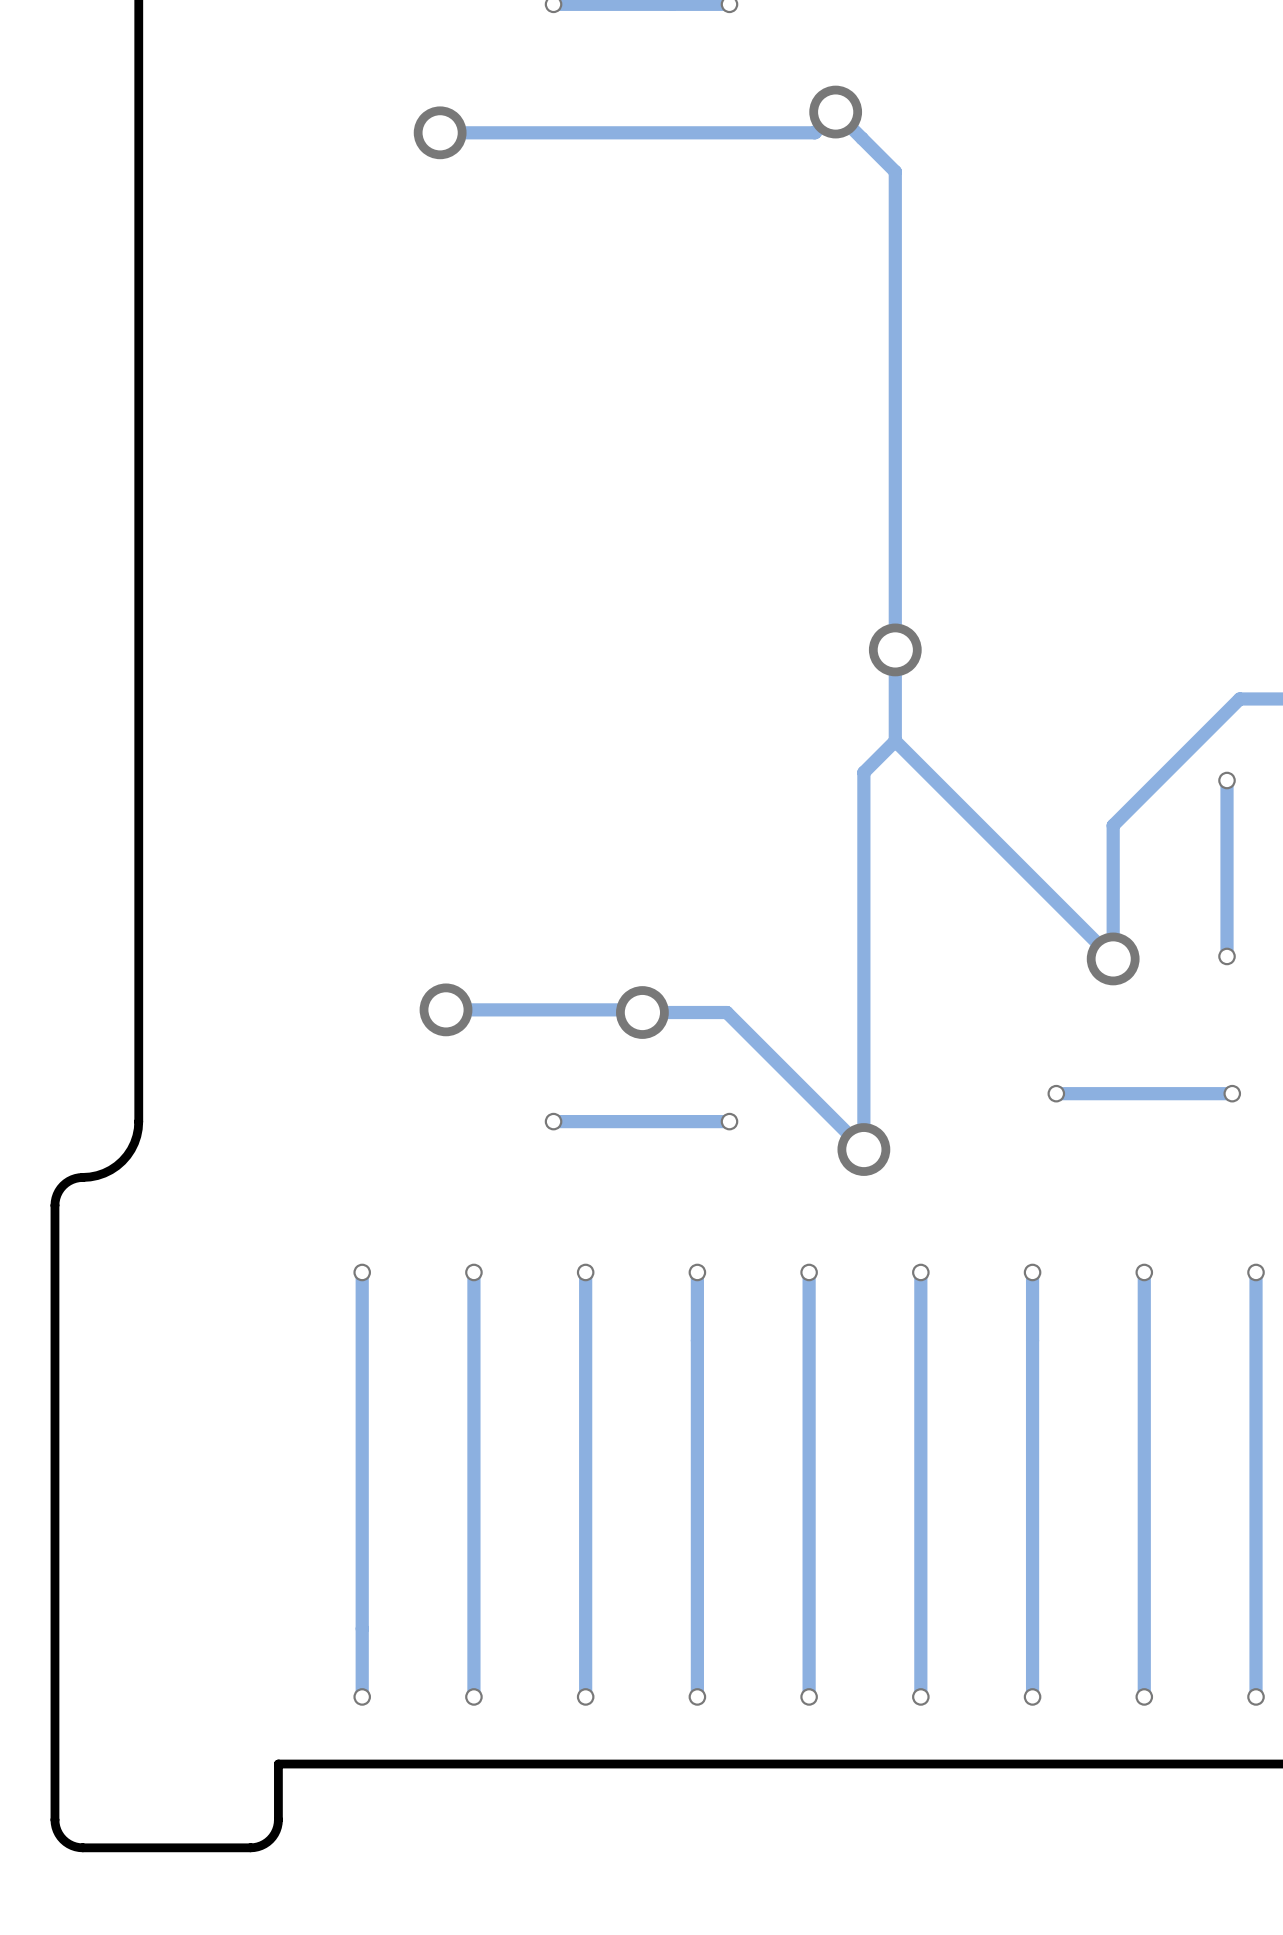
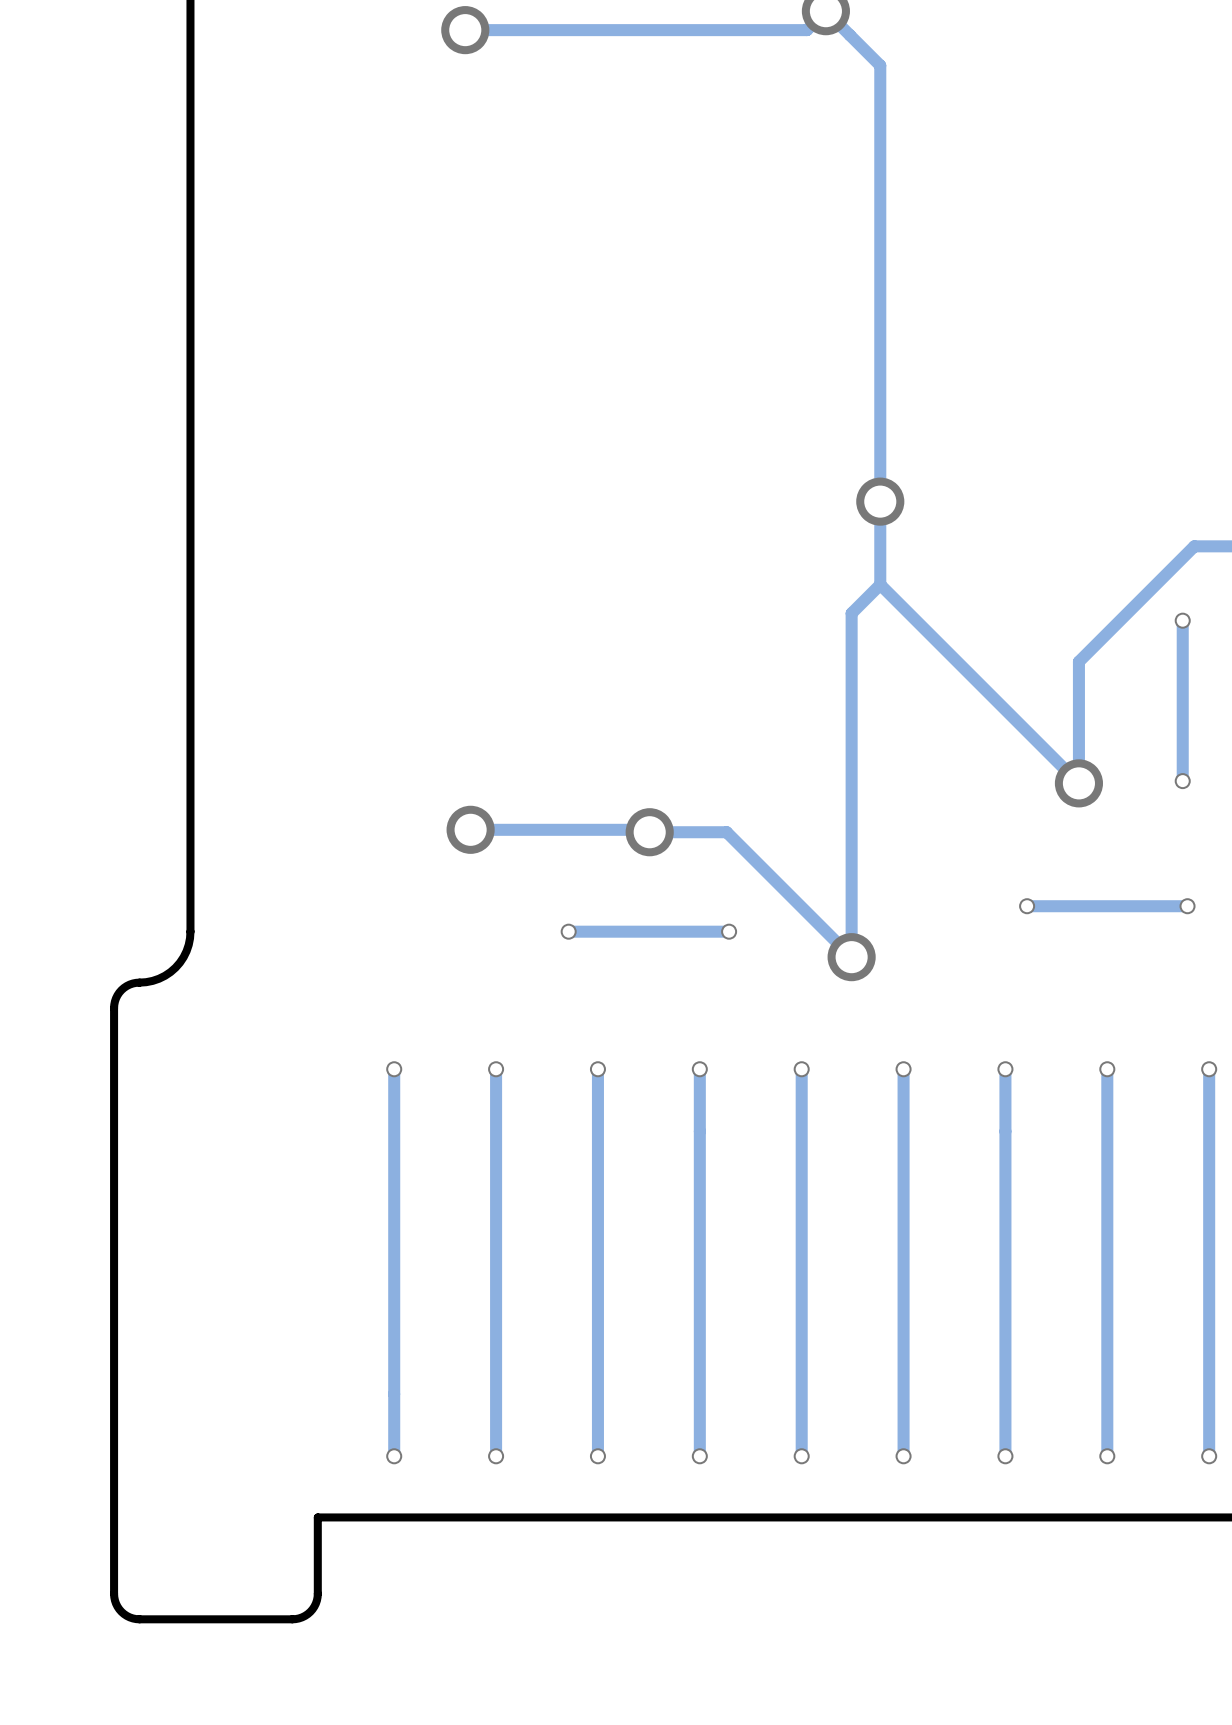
board edge: (54, 1819) (57, 1830) (63, 1839) (72, 1845) (82, 1847) -> none
board edge: (278, 1819) (272, 1836) (264, 1844) (254, 1847) (82, 1847) -> (317, 1568) (317, 1597) (314, 1606) (305, 1615) (292, 1619) (132, 1618) (124, 1614) (116, 1603) (114, 1568)

